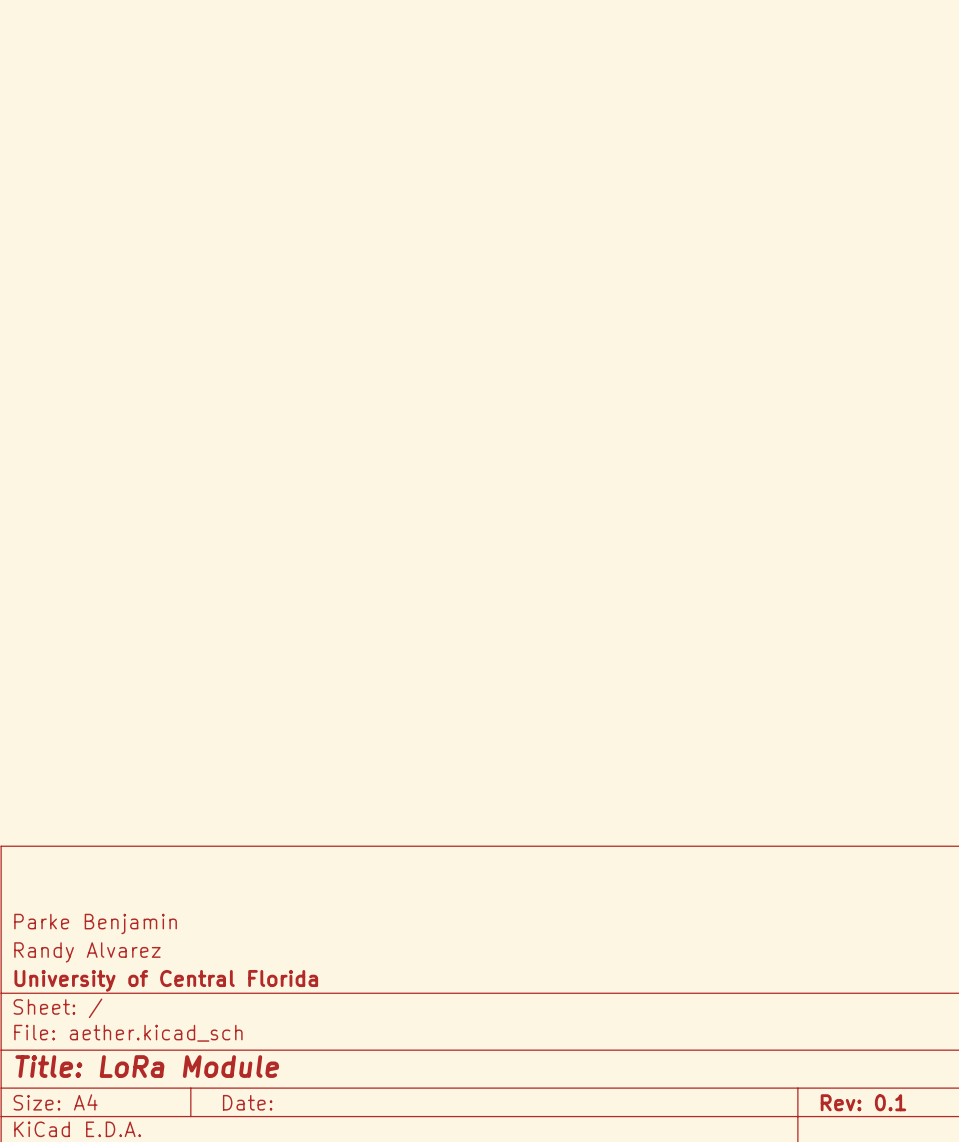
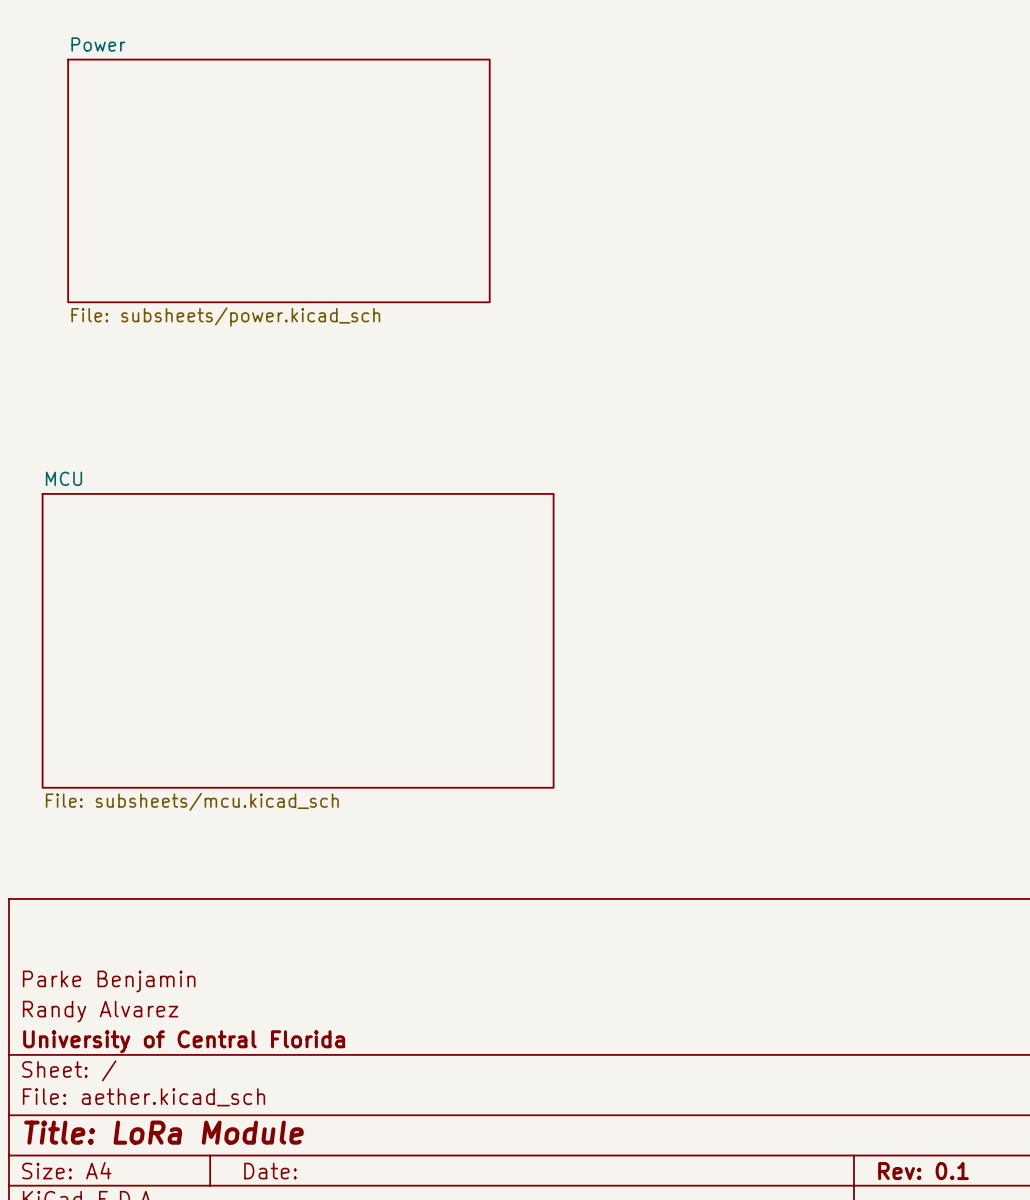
sheet Power: none -> File: subsheets/power.kicad_sch (278, 180)
sheet MCU: none -> File: subsheets/mcu.kicad_sch (298, 640)

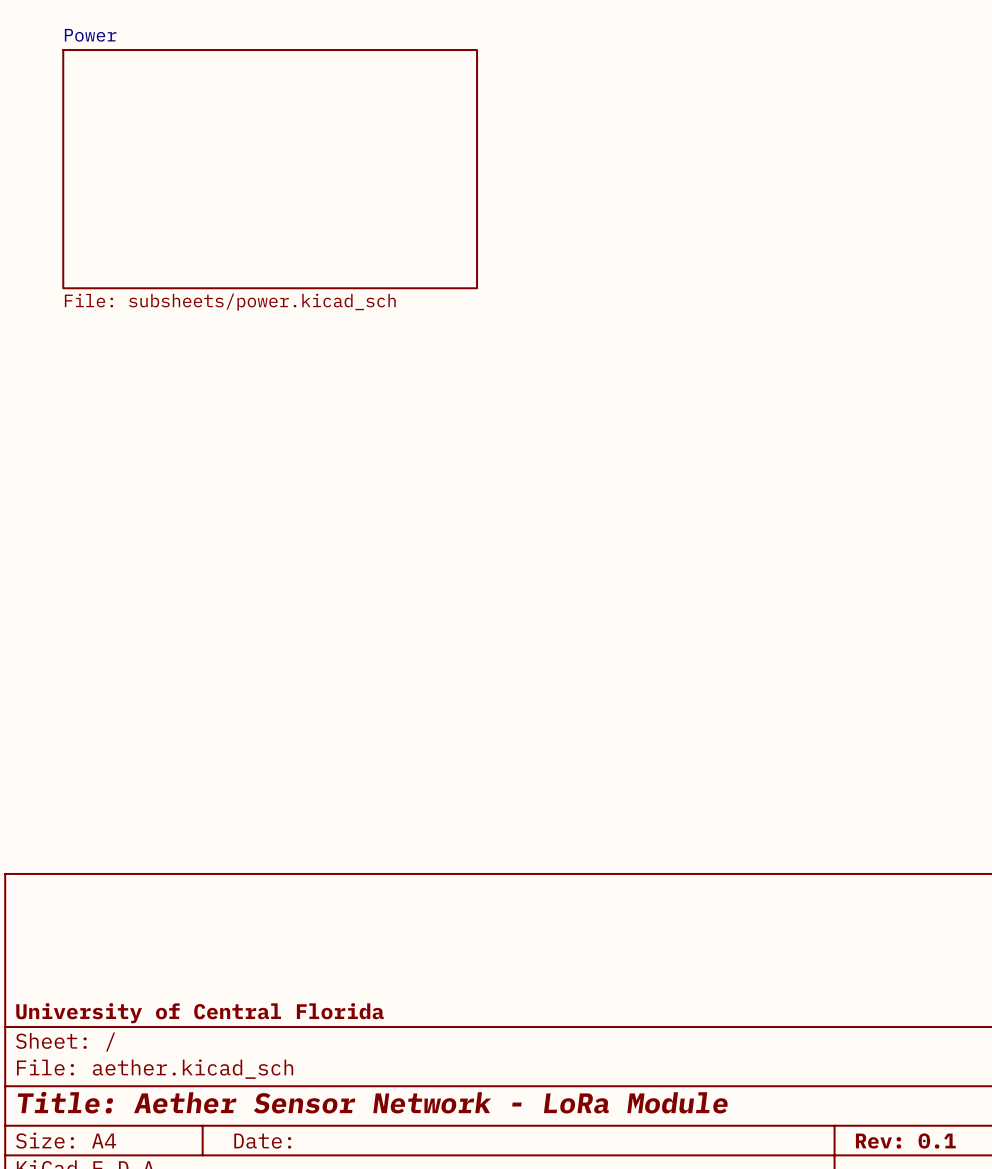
sheet MCU: File: subsheets/mcu.kicad_sch (298, 640) -> none
title block: Parke Benjamin (109, 981) -> none
title block: Randy Alvarez (100, 1011) -> none
title block: Title: LoRa Module (163, 1132) -> Title: Aether Sensor Network - LoRa Module (372, 1102)

